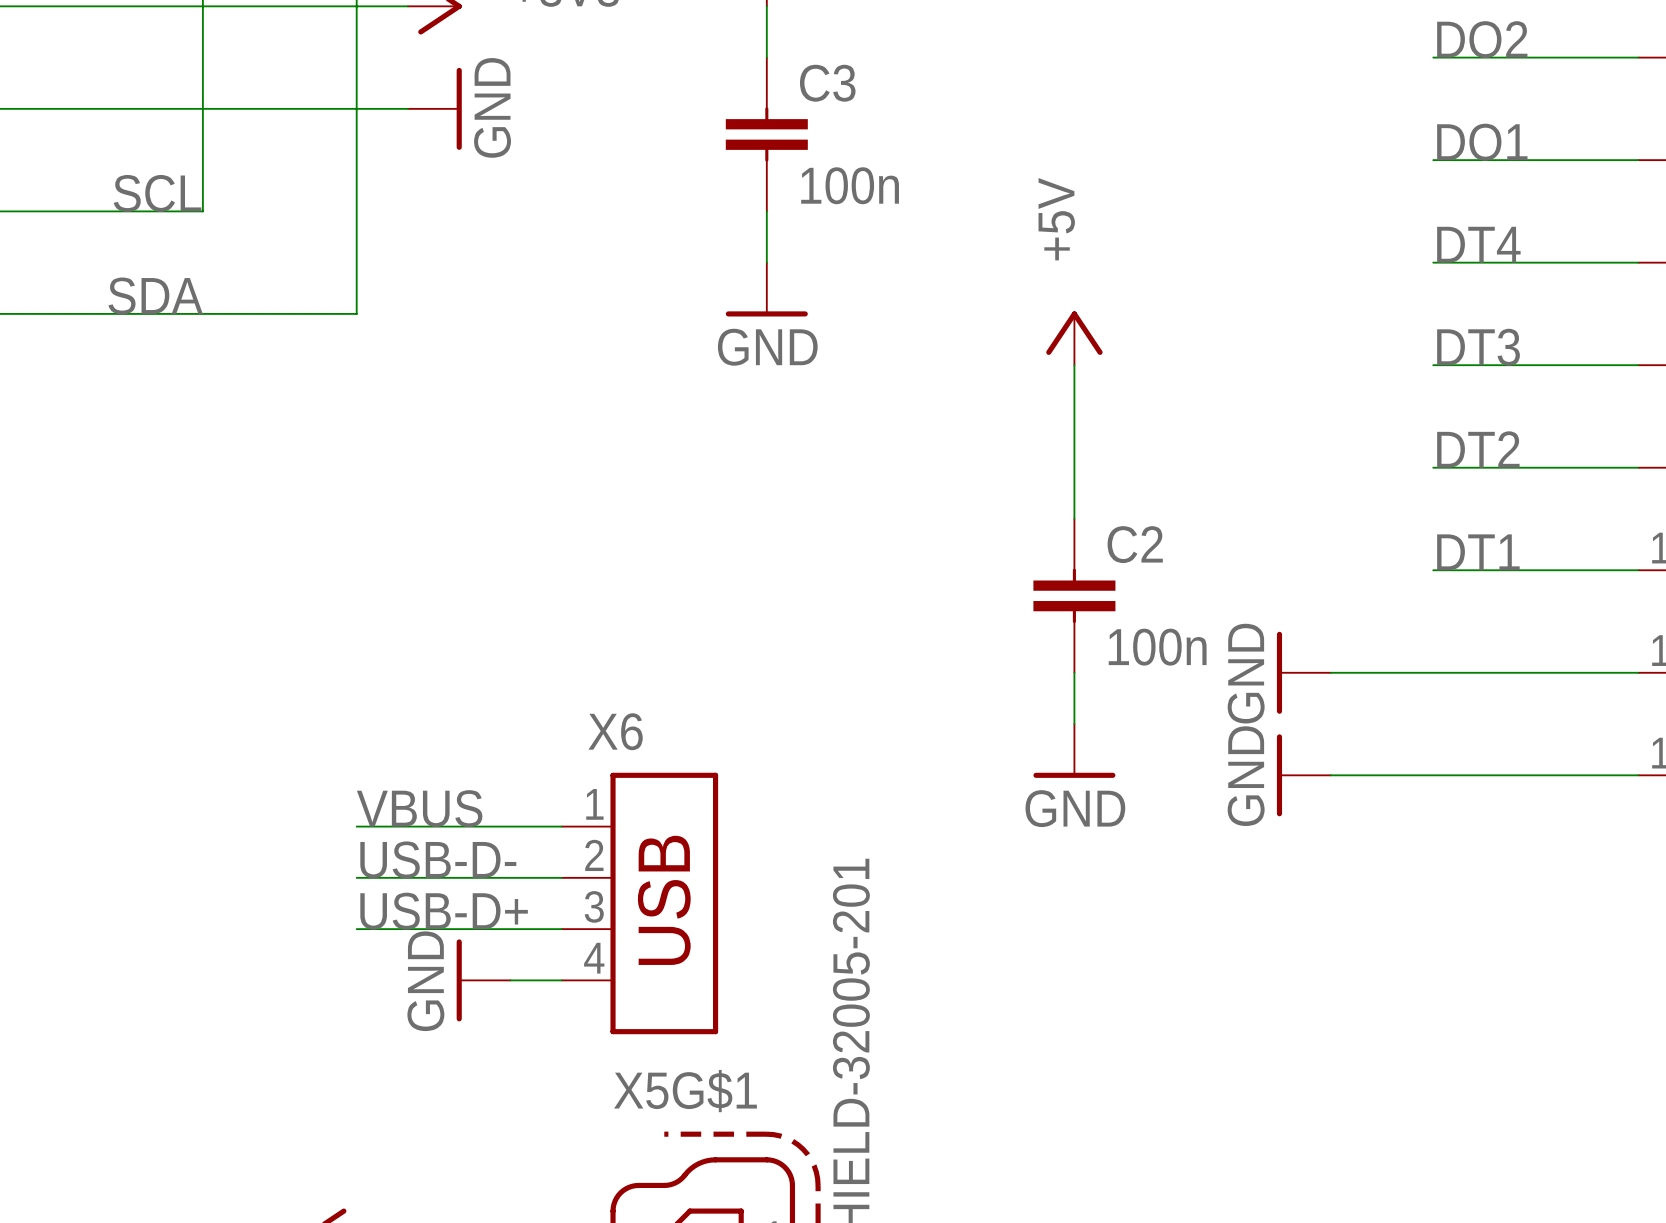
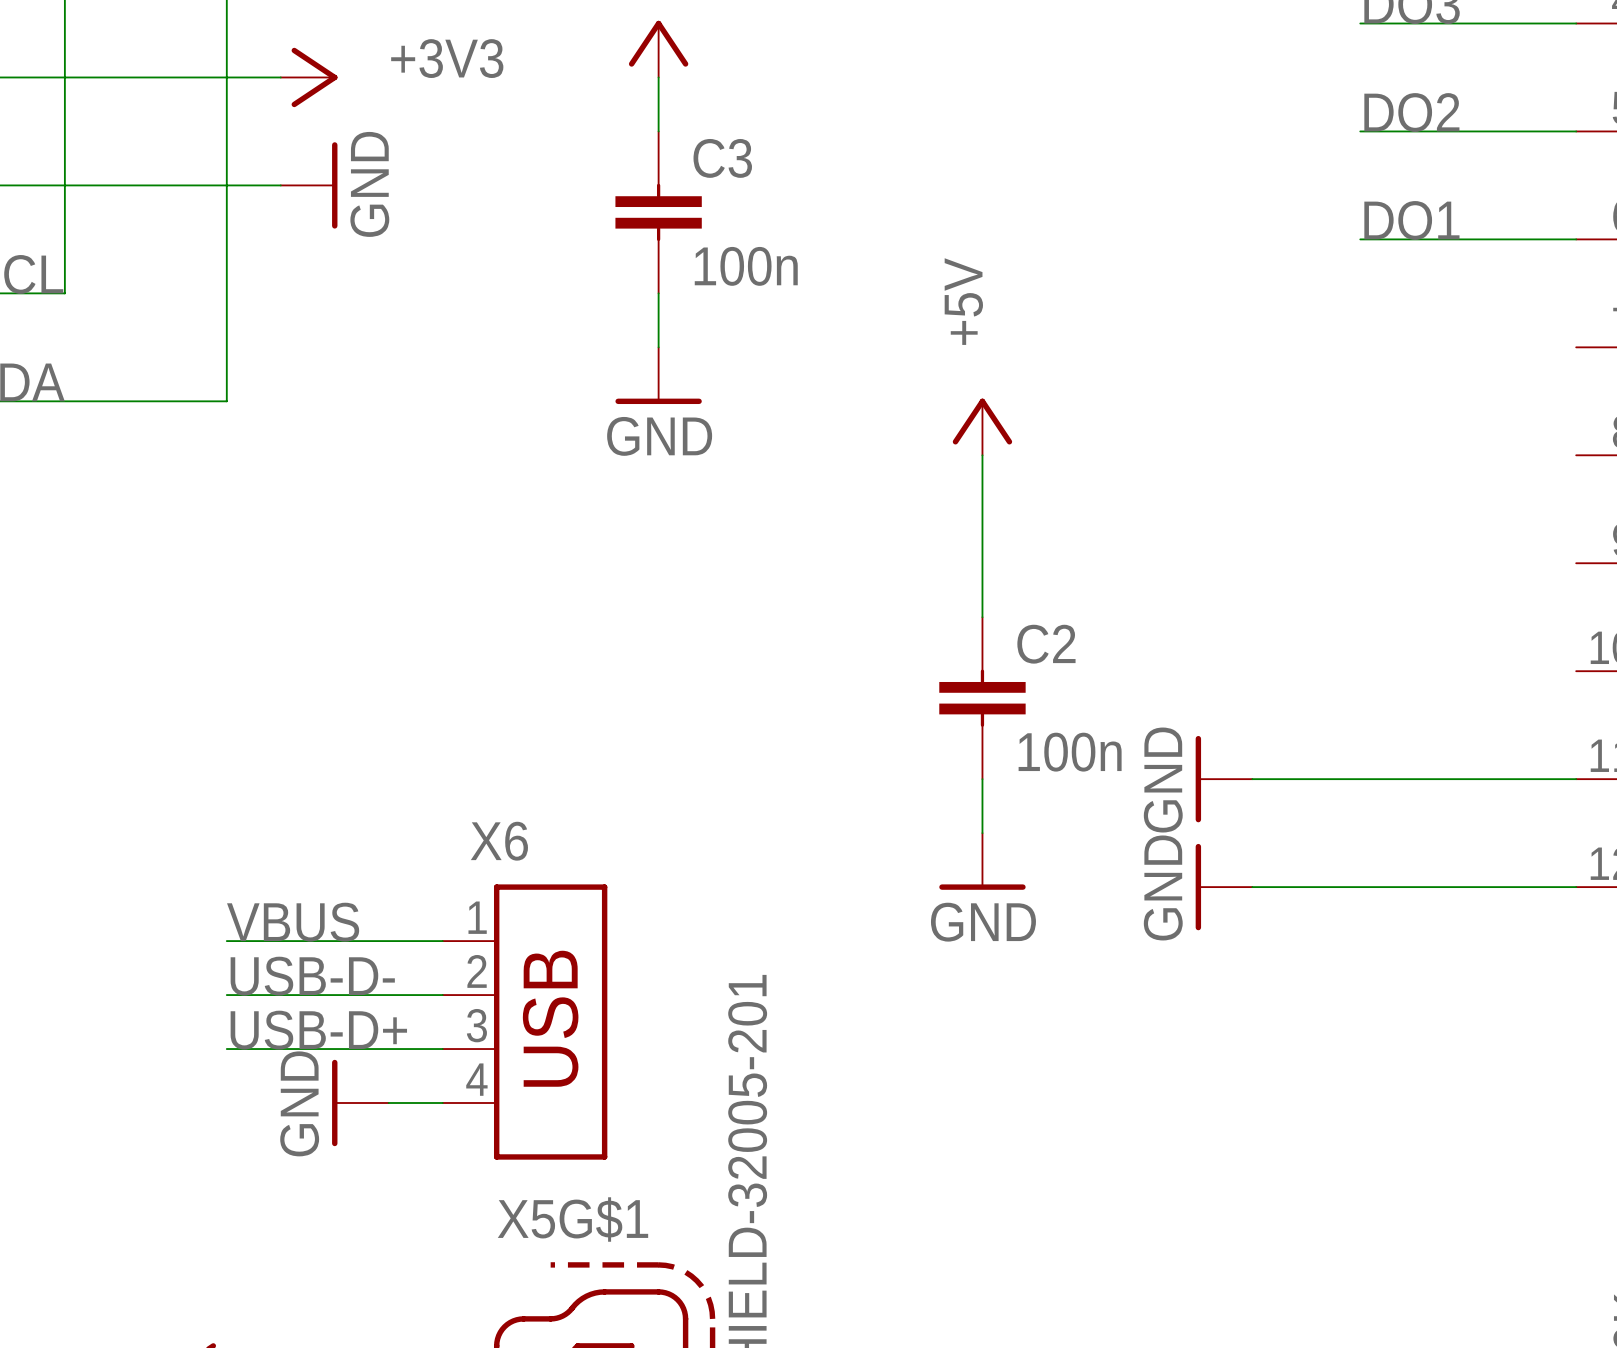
label: DT4 (1478, 244) -> none
wire: (1433, 262) (1638, 262) -> none
label: DT3 (1478, 347) -> none
wire: (1433, 365) (1638, 365) -> none
label: DT2 (1478, 449) -> none
wire: (1433, 467) (1638, 467) -> none
label: DT1 (1478, 552) -> none
wire: (1433, 570) (1638, 570) -> none

